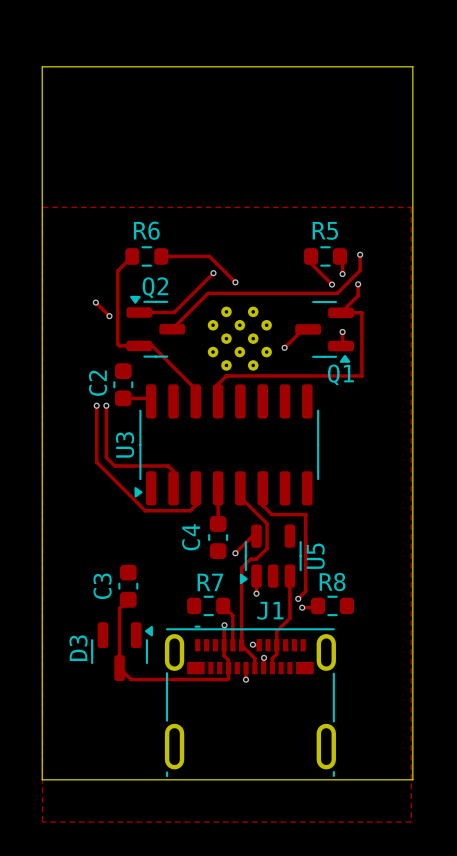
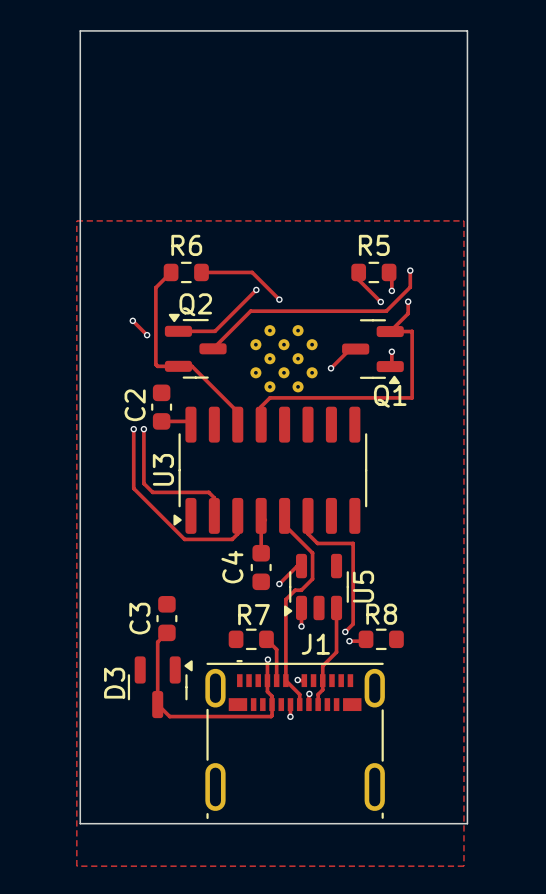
board edge: (42, 66) (412, 66) (412, 779) (42, 779) (42, 66) -> (80, 30) (80, 823) (467, 823) (467, 30) (80, 30)

